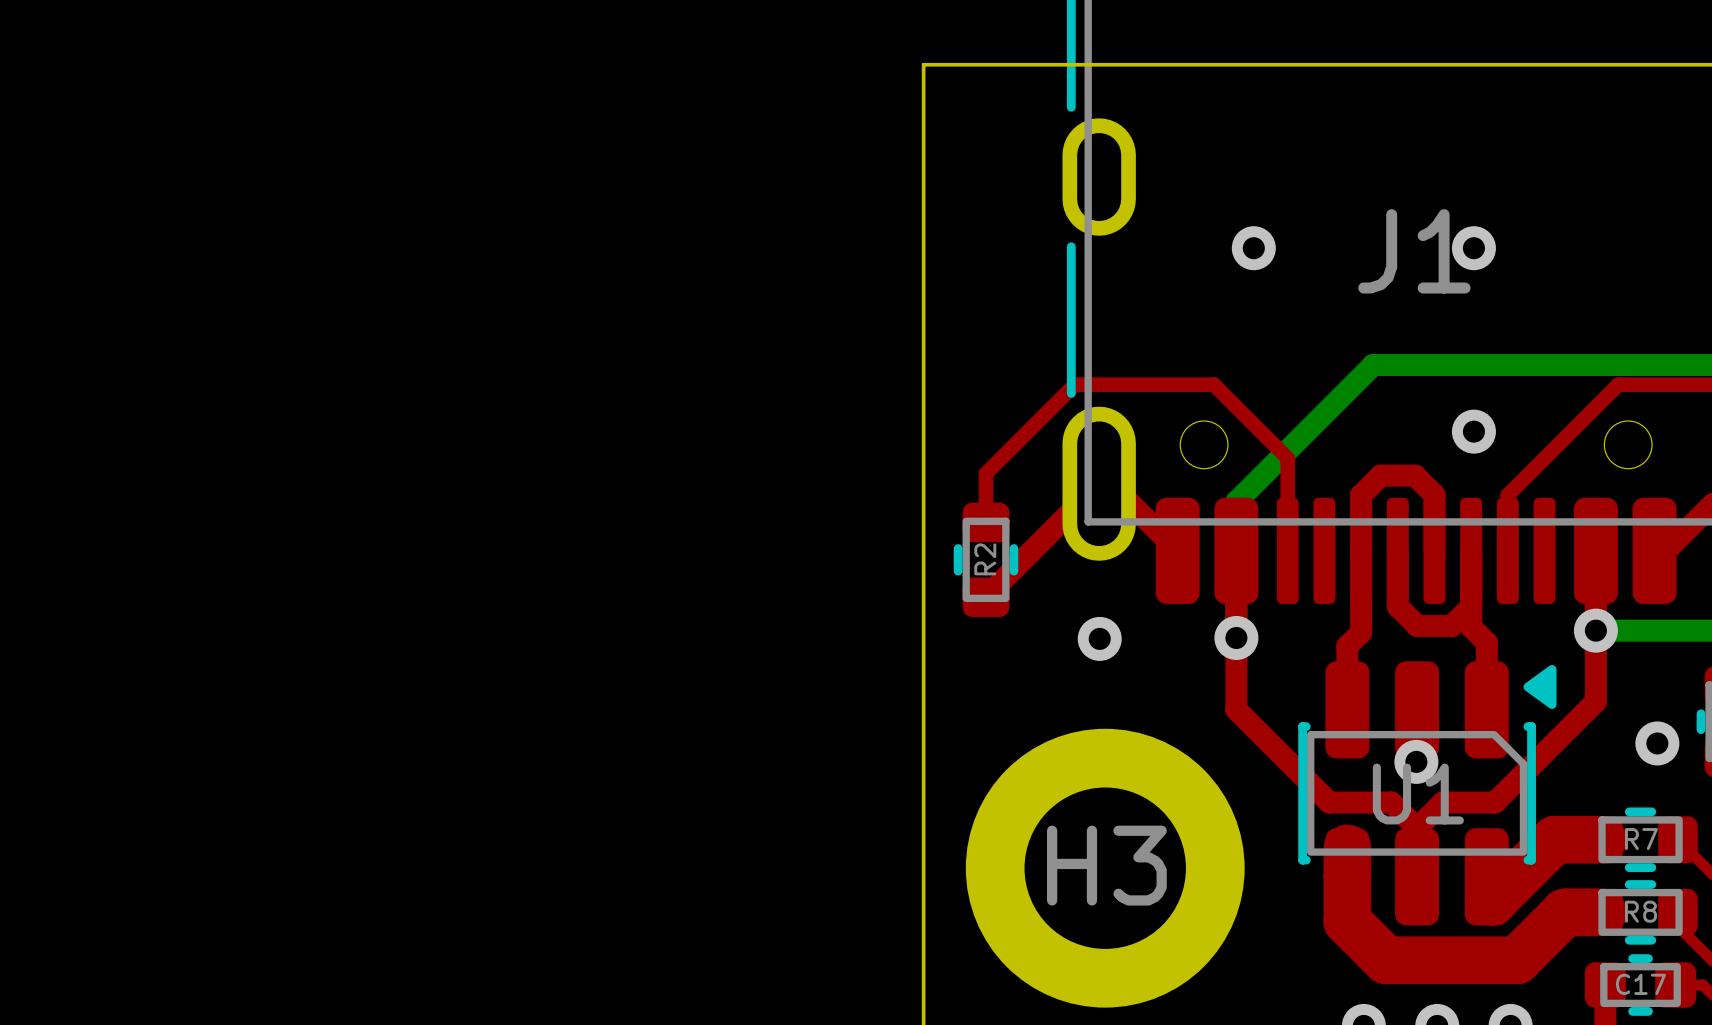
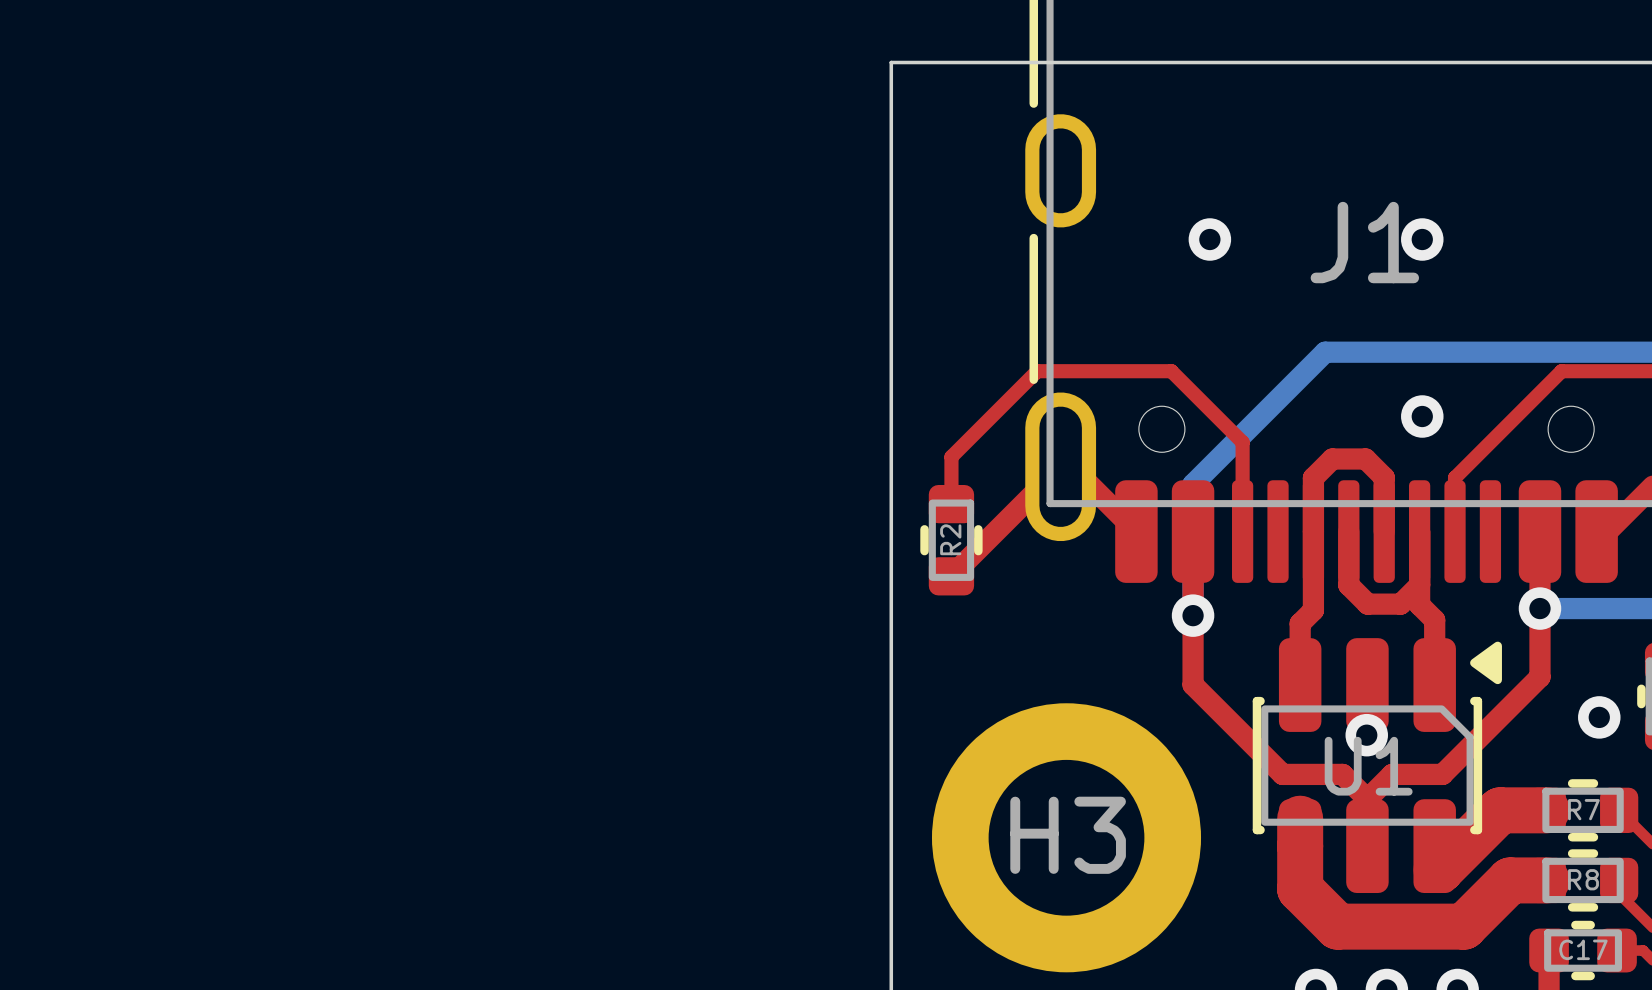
via: (1099, 638) -> none

